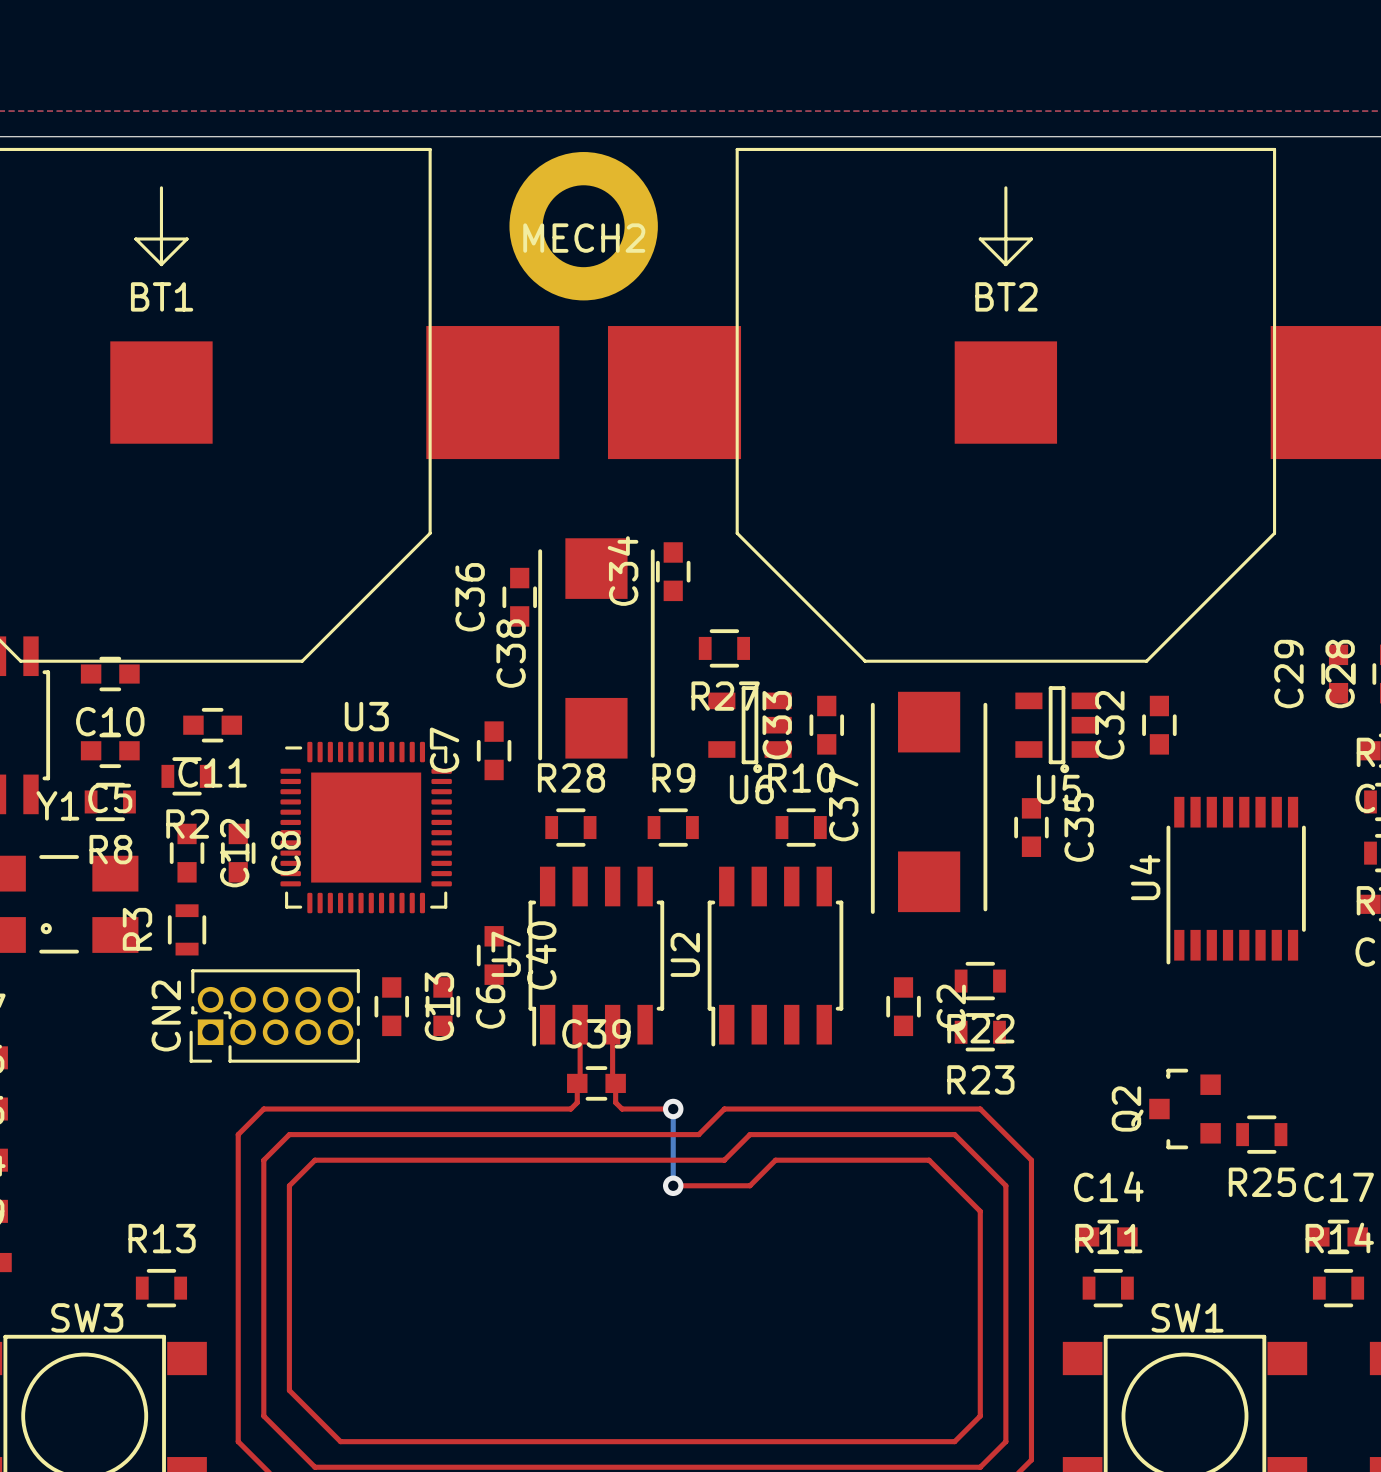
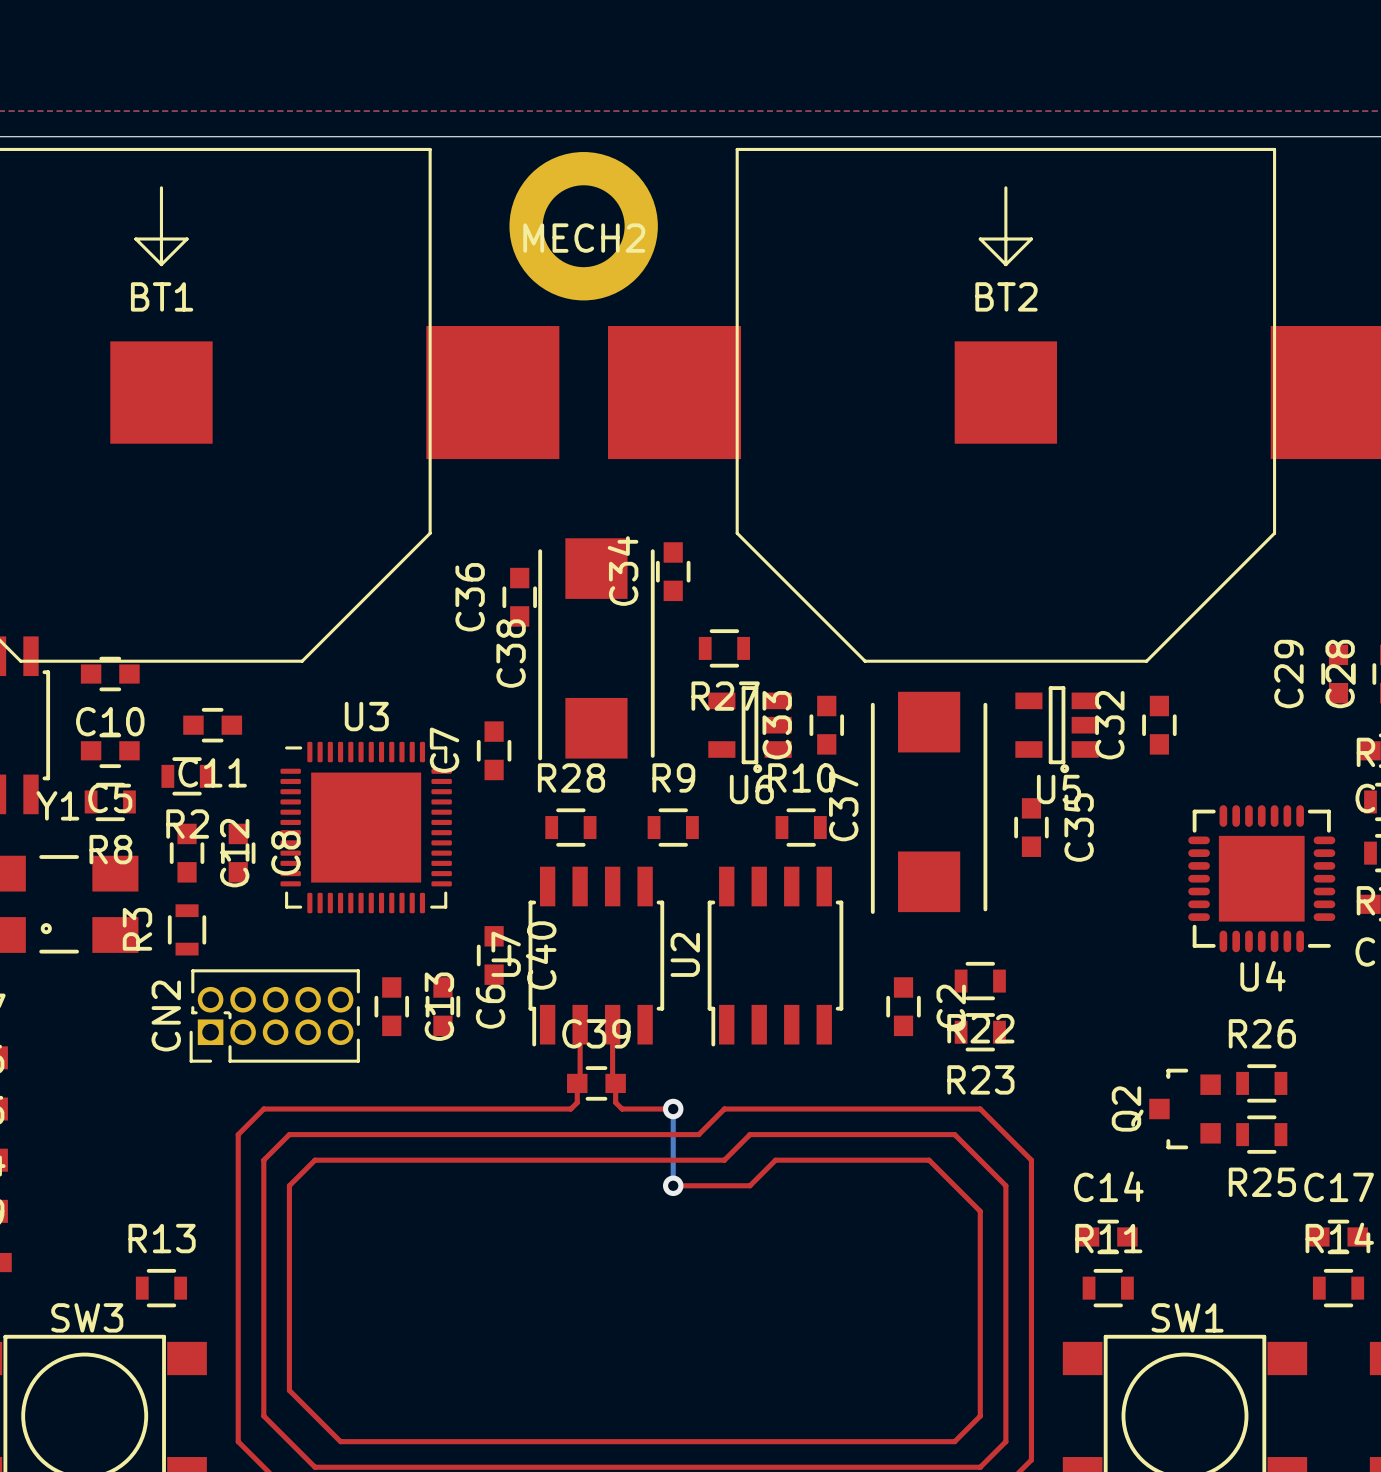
U4 footprint: [1166, 796, 1306, 965] -> [1188, 805, 1336, 953]
U4 name position: U4 (1145, 877) -> U4 (1262, 976)
R26: none -> (1261, 1083)

